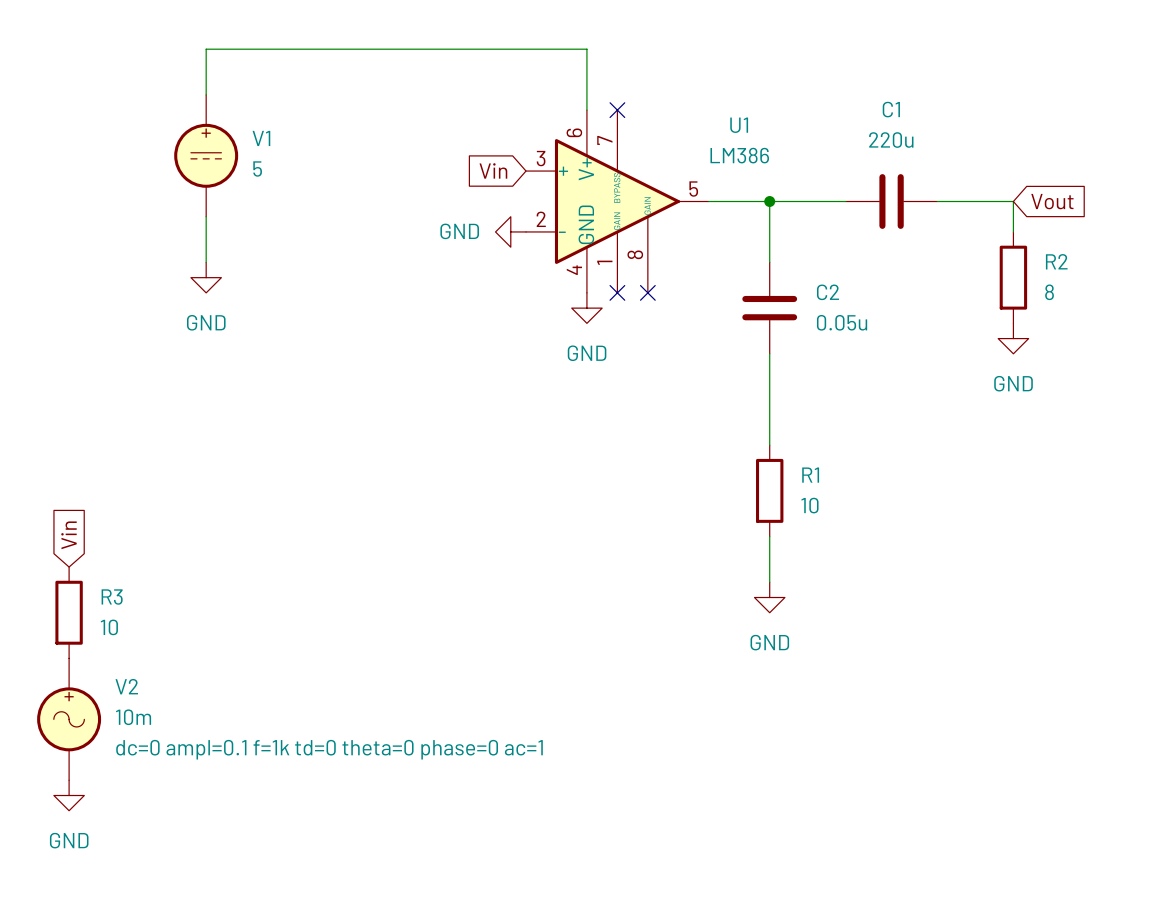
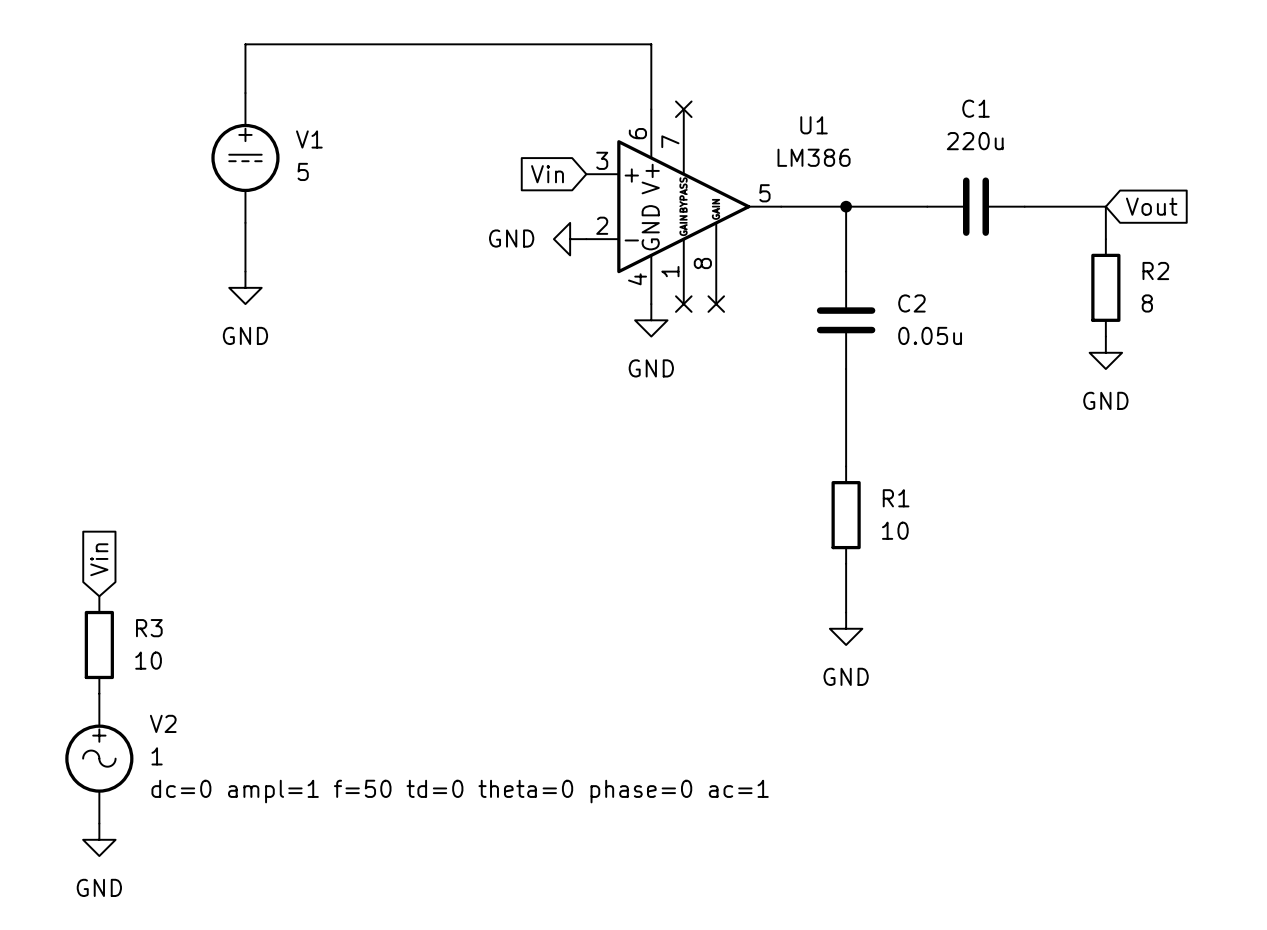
V2 value: 10m (133, 717) -> 1 (157, 756)
V2 text: dc=0 ampl=0.1 f=1k td=0 theta=0 phase=0 ac=1 (329, 749) -> dc=0 ampl=1 f=50 td=0 theta=0 phase=0 ac=1 (460, 791)

